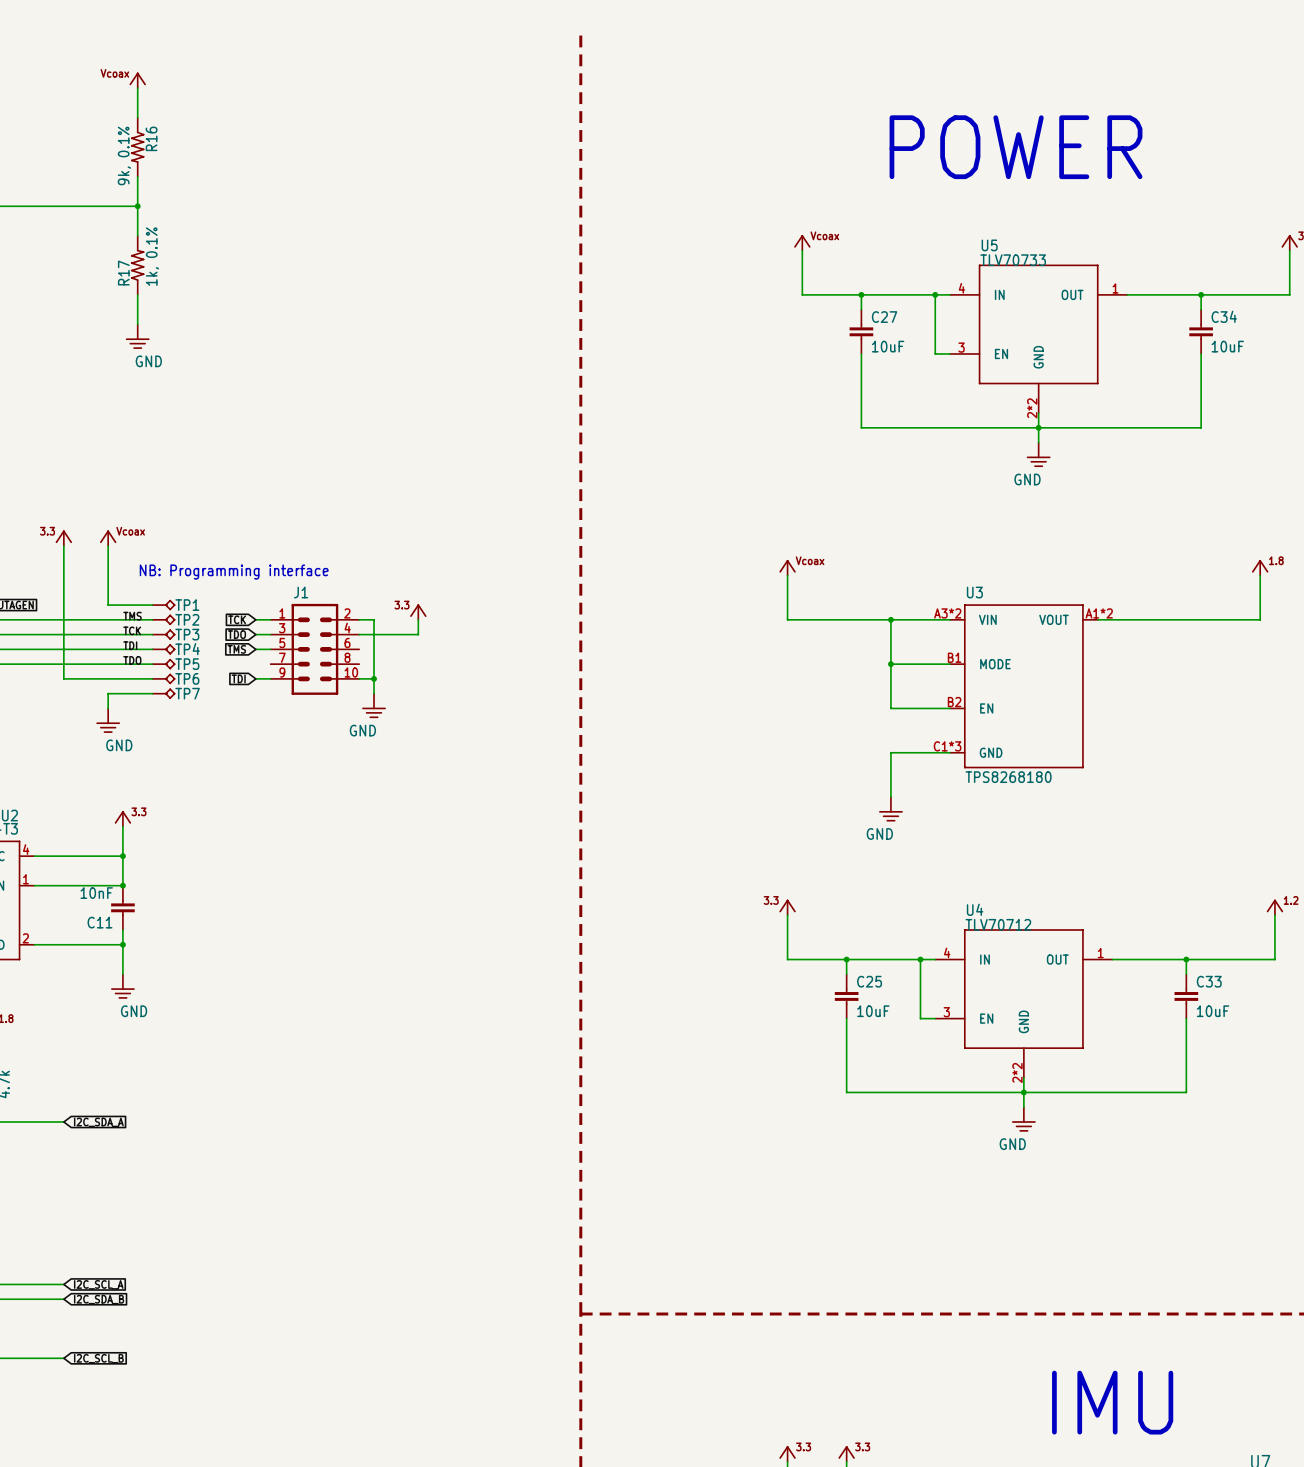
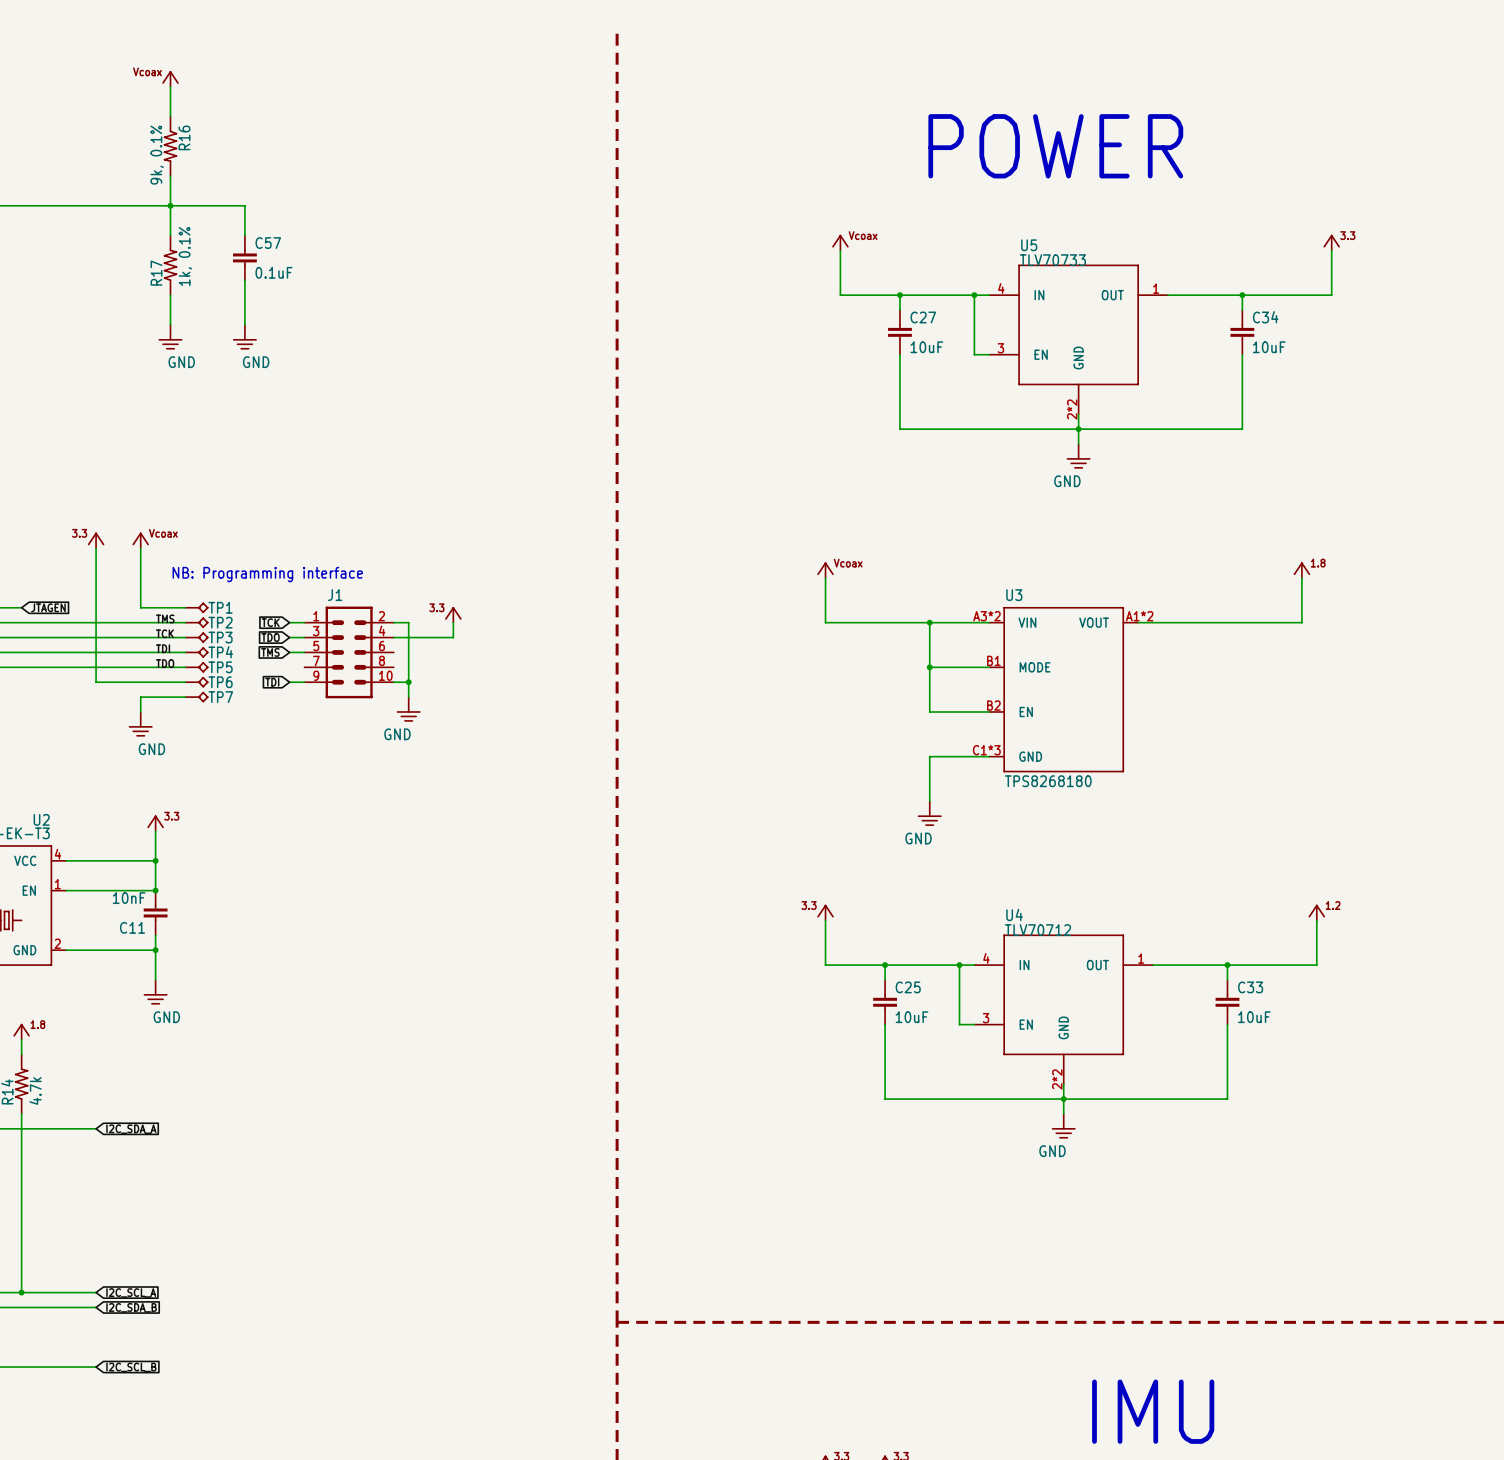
wire: none -> (170, 205) (244, 205) (244, 235)
C57: none -> 0.1uF (244, 257)
wire: none -> (244, 280) (244, 324)
power symbol: none -> GND (244, 337)

